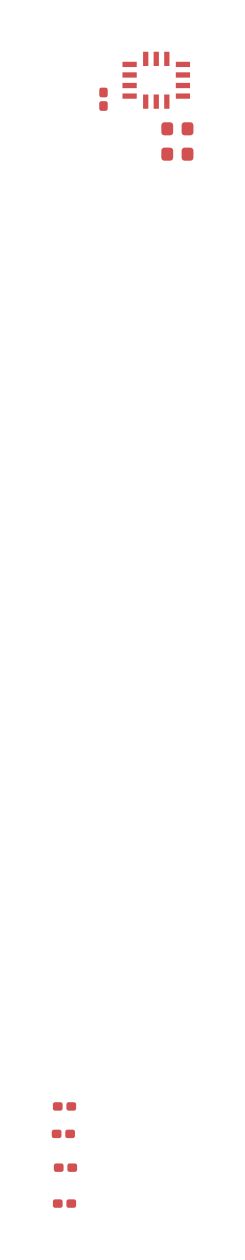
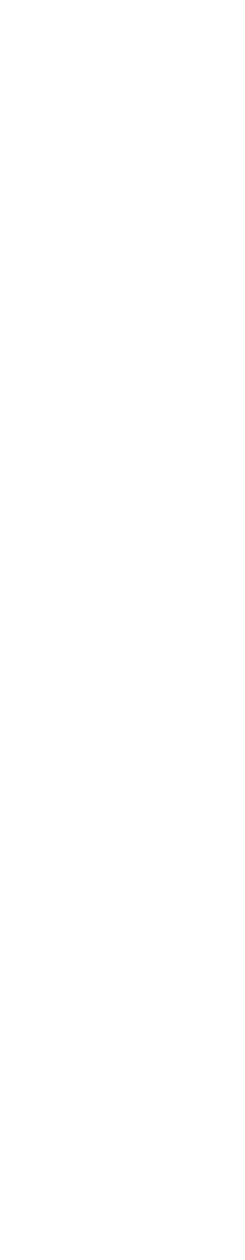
part: (156, 80) -> none
part: (103, 99) -> none
part: (177, 128) -> none
part: (177, 154) -> none
part: (64, 1106) -> none
part: (63, 1133) -> none
part: (65, 1167) -> none
part: (64, 1203) -> none

